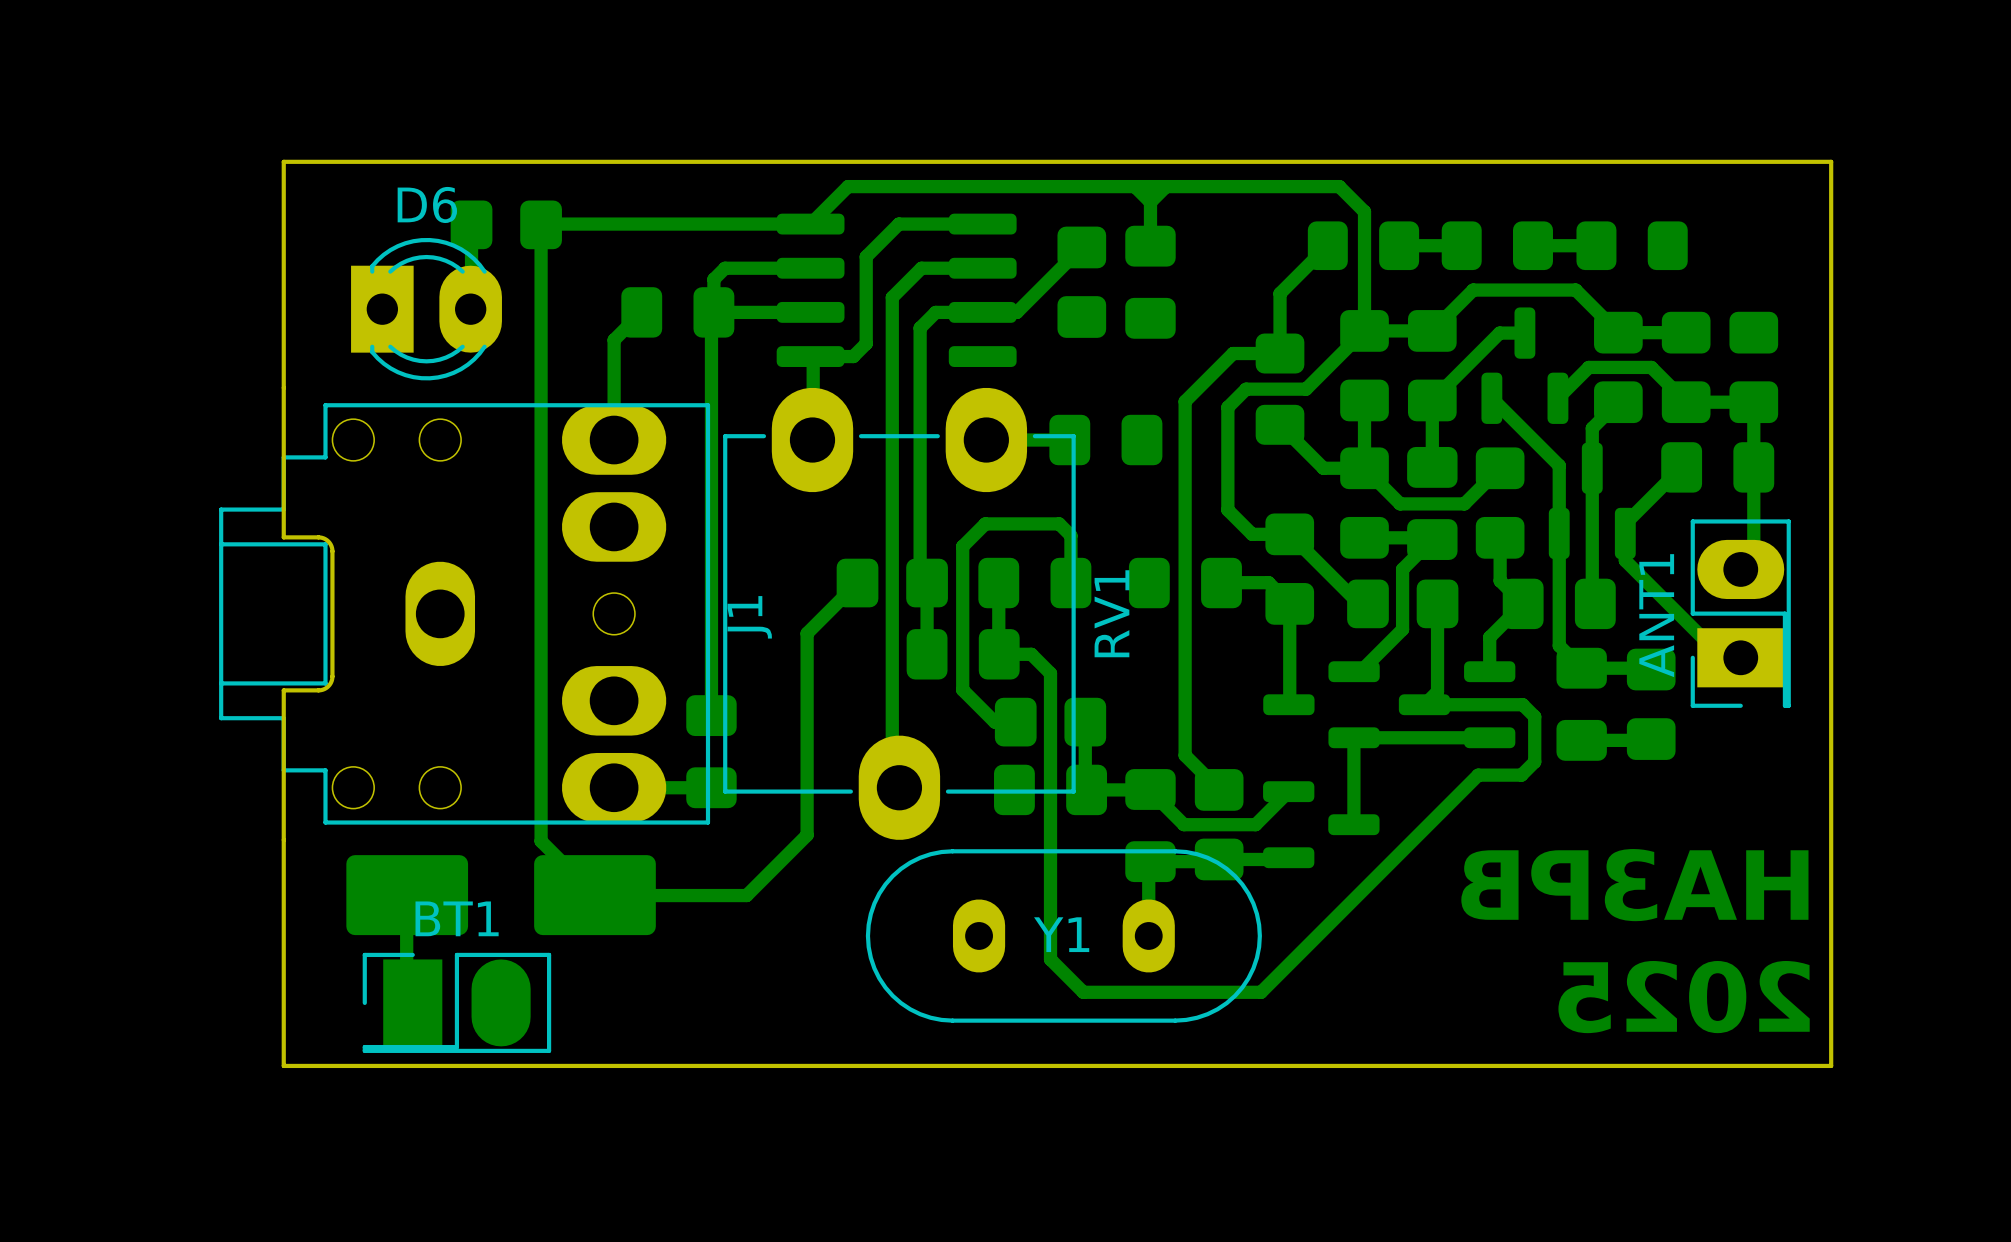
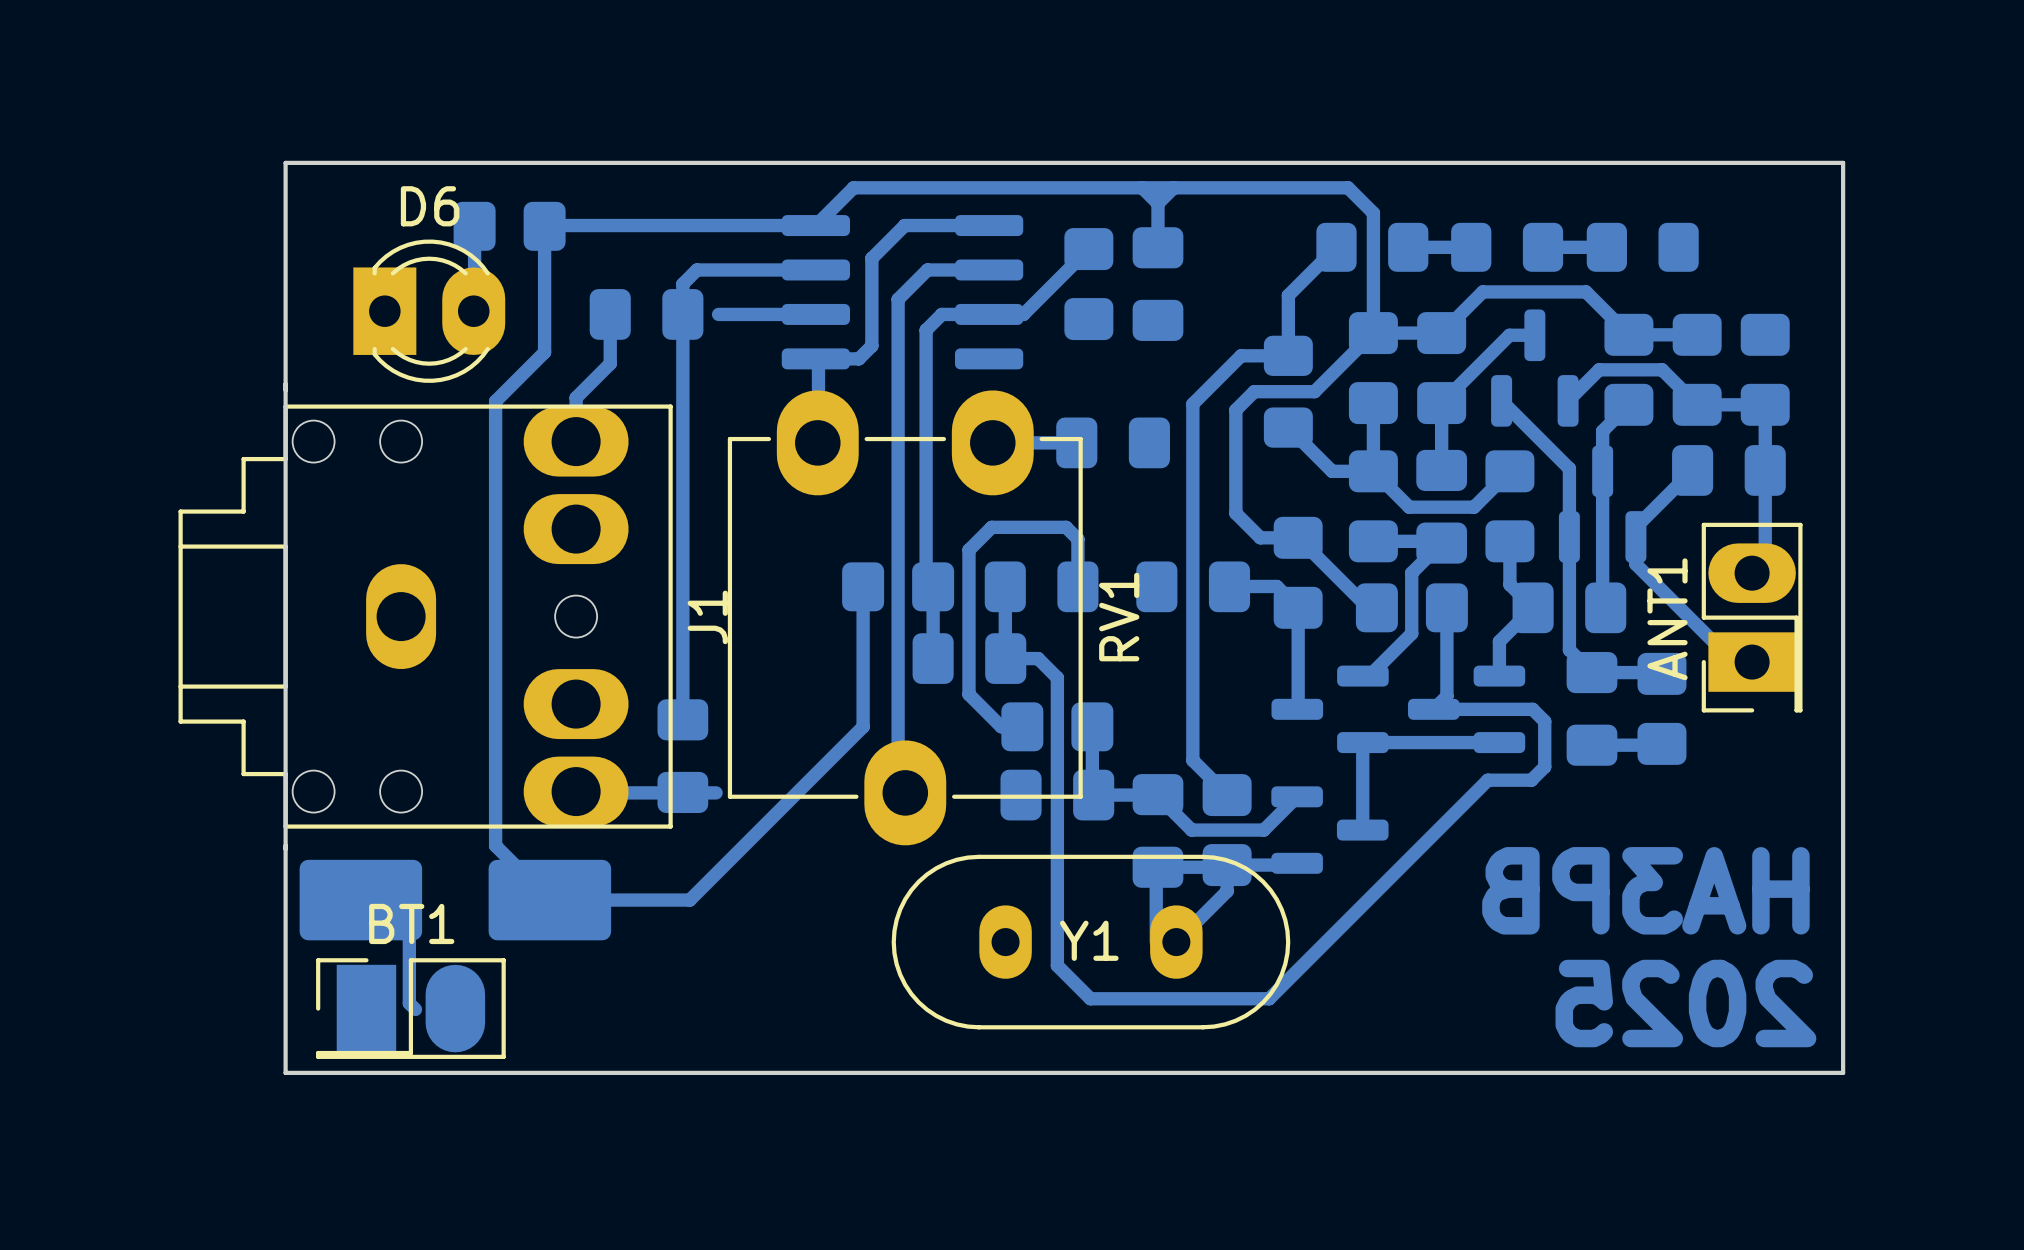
bottom track: (725, 268) (713, 279) (713, 322) (711, 325) (711, 715) -> (729, 269) (696, 269) (682, 284) (682, 719)
bottom track: none -> (610, 314) (610, 363) (576, 397) (576, 441)
bottom track: (641, 312) (614, 340) (614, 440) -> none
part position: (677, 312) -> (646, 314)
bottom track: (541, 350) (541, 841) (595, 895) (746, 895) (807, 835) (807, 633) (857, 583) -> (544, 352) (495, 401) (495, 845) (549, 900) (689, 900) (863, 726) (863, 586)
J1 footprint: [219, 385, 711, 842] -> [178, 382, 673, 851]
part position: (711, 751) -> (682, 756)
bottom track: none -> (1227, 865) (1227, 891) (1176, 942)
part position: (501, 895) -> (455, 900)
Y1 position: (1063, 935) -> (1090, 942)
BT1 position: (456, 1002) -> (410, 1008)

